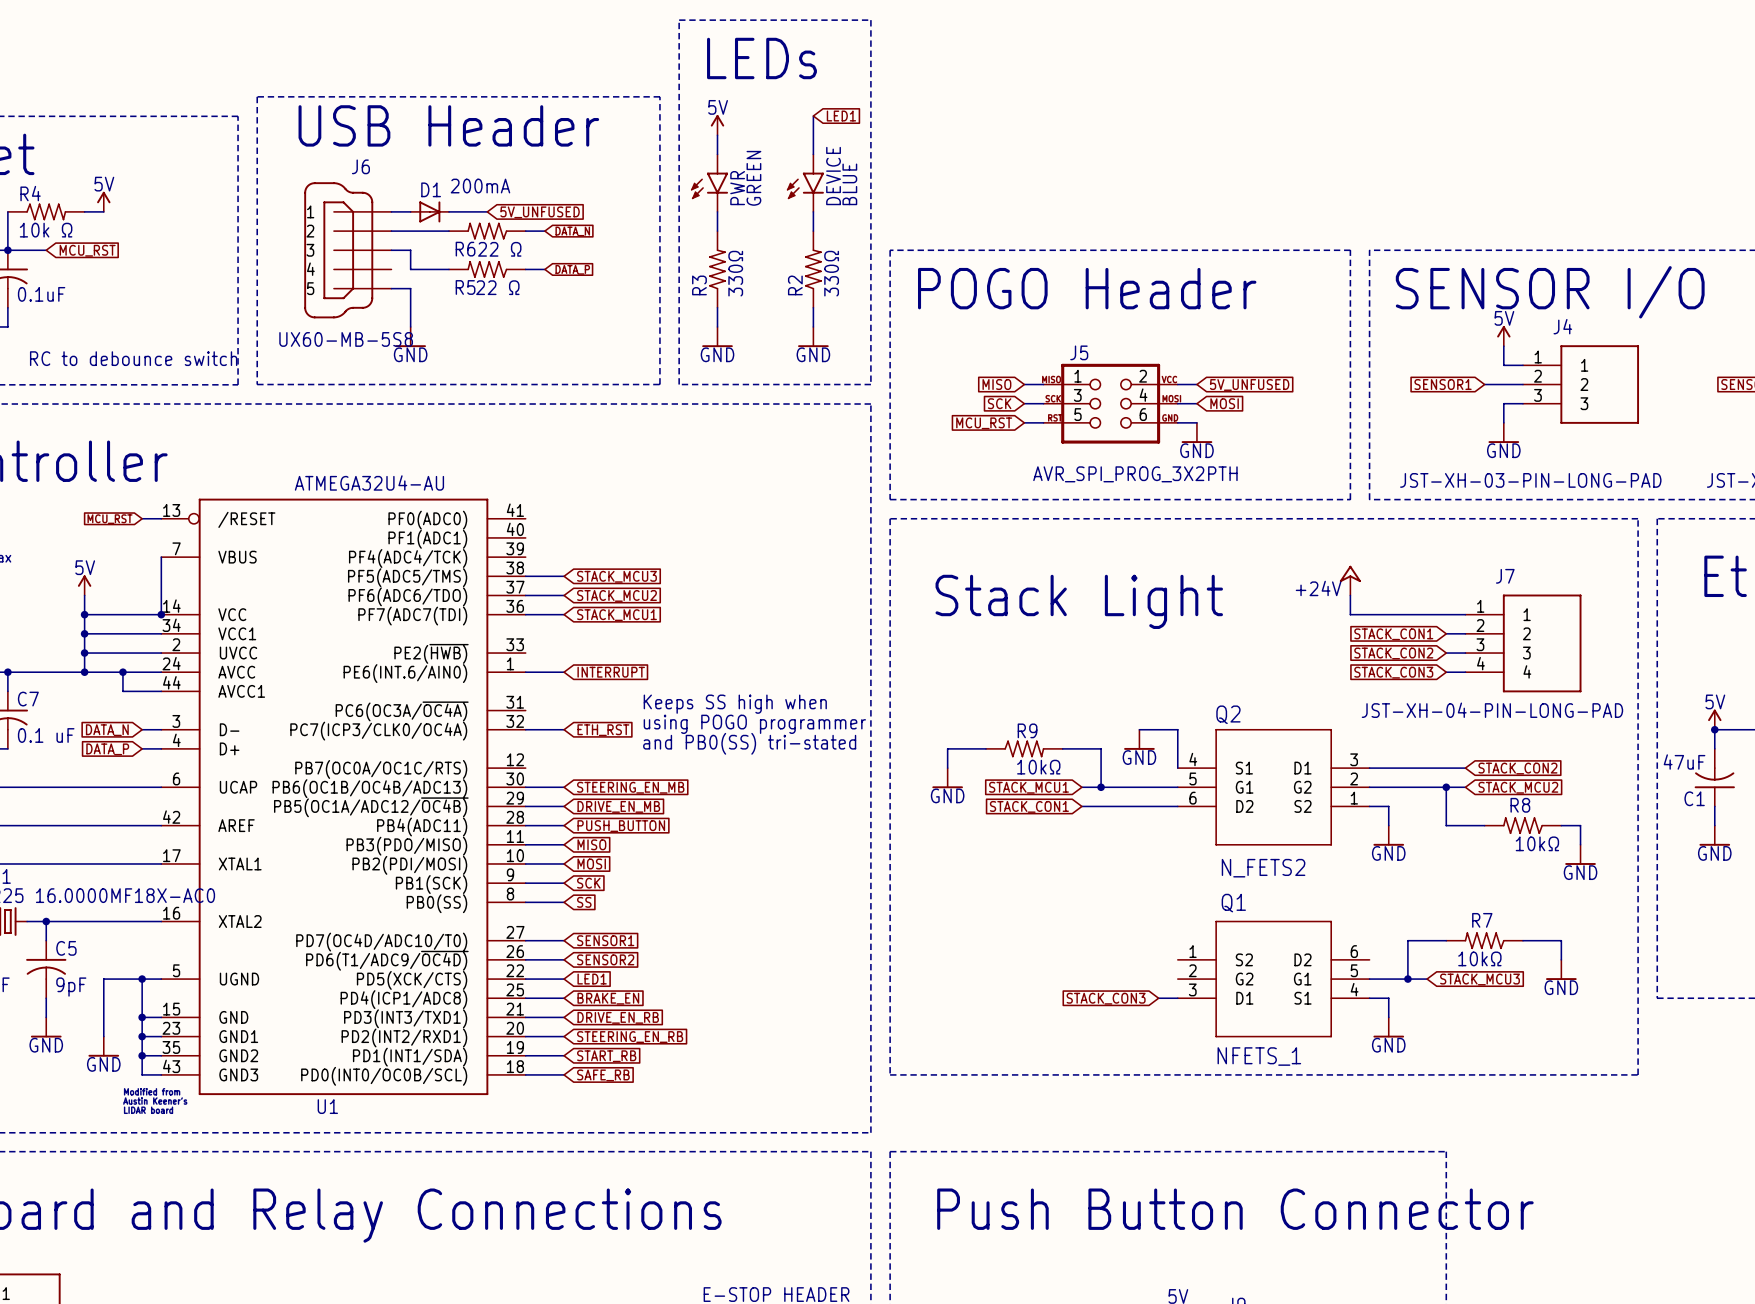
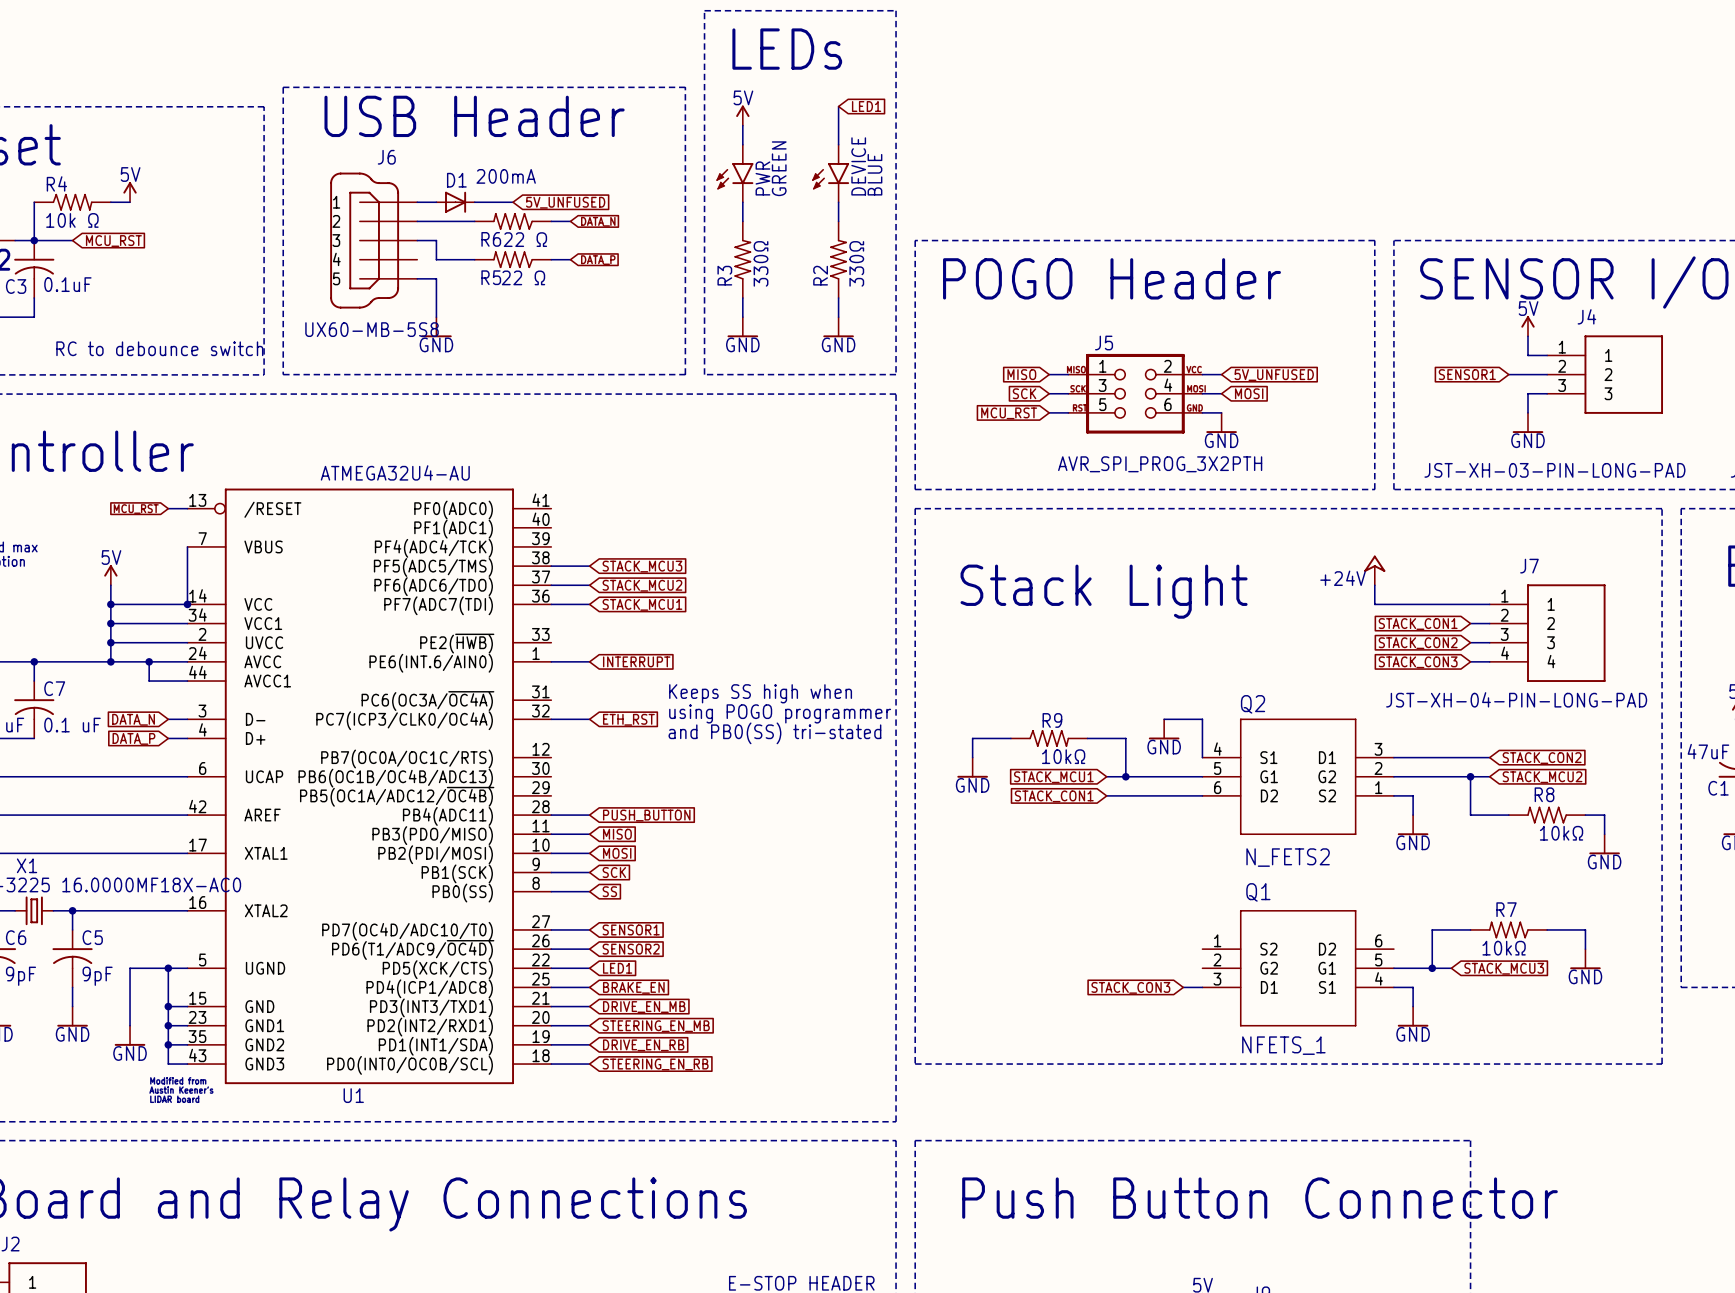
wire: (525, 787) (564, 787) -> none
global label: STEERING_EN_MB (630, 787) -> none
wire: (525, 806) (564, 806) -> none
global label: DRIVE_EN_MB (618, 806) -> none
global label: DRIVE_EN_RB (618, 1017) -> DRIVE_EN_MB (644, 1007)
global label: STEERING_EN_RB (630, 1037) -> STEERING_EN_MB (656, 1026)
global label: START_RB (606, 1056) -> DRIVE_EN_RB (643, 1045)
global label: SAFE_RB (603, 1075) -> STEERING_EN_RB (655, 1064)

